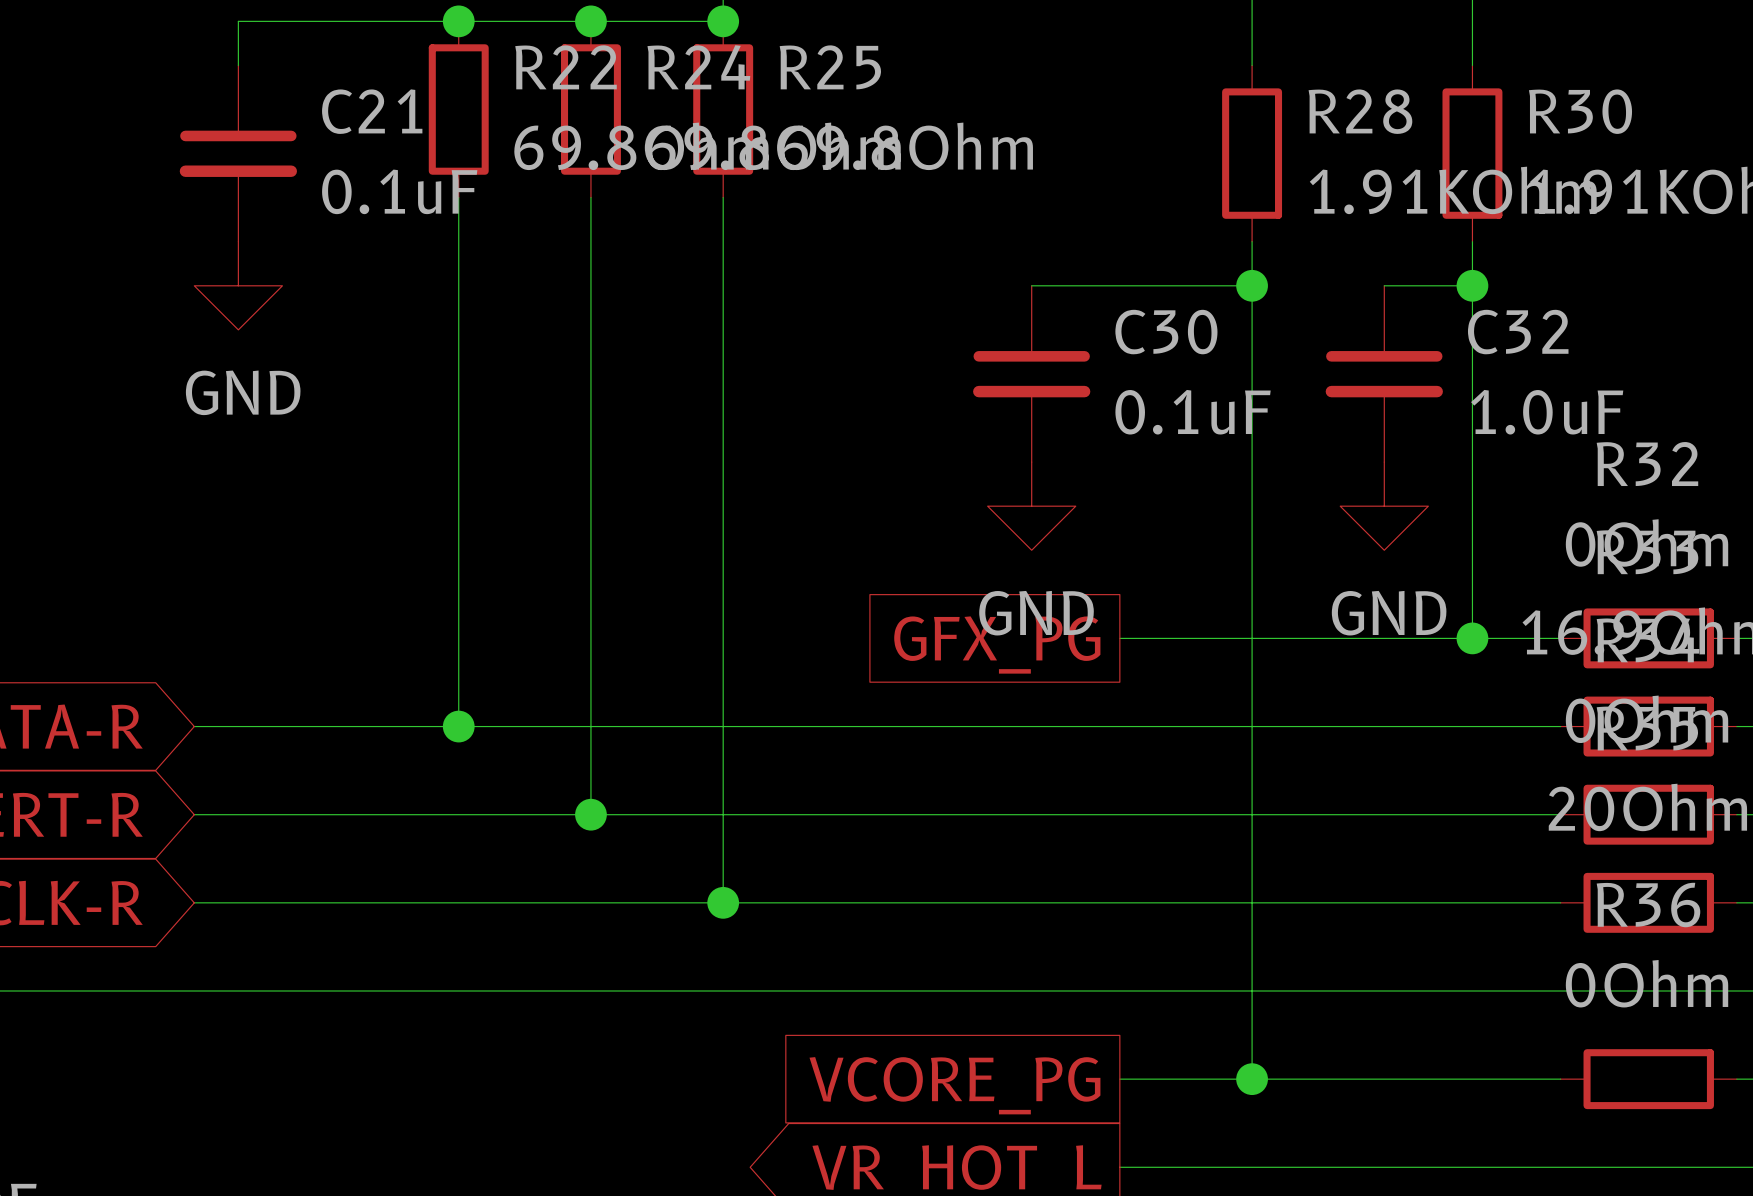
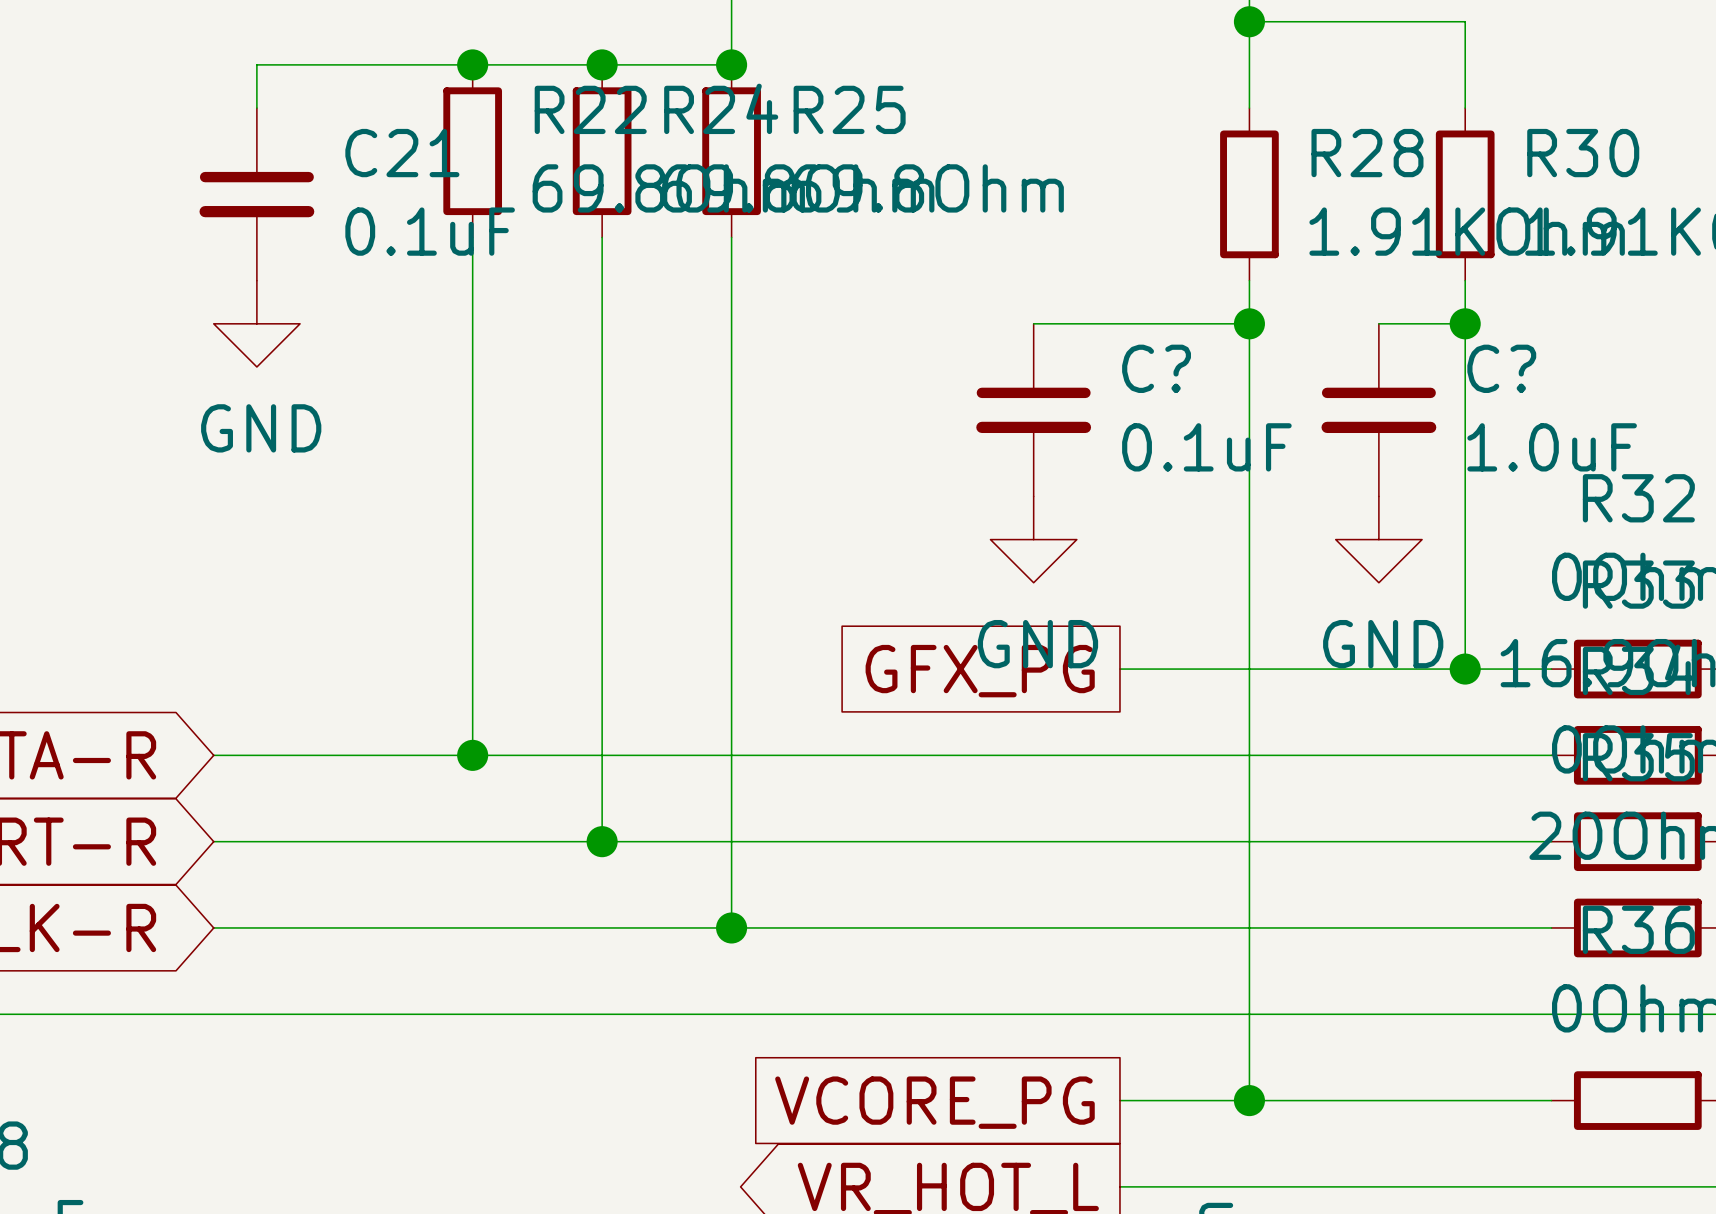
C30 name: C30 (1166, 332) -> C? (1156, 368)
C32 name: C32 (1518, 332) -> C? (1501, 368)

